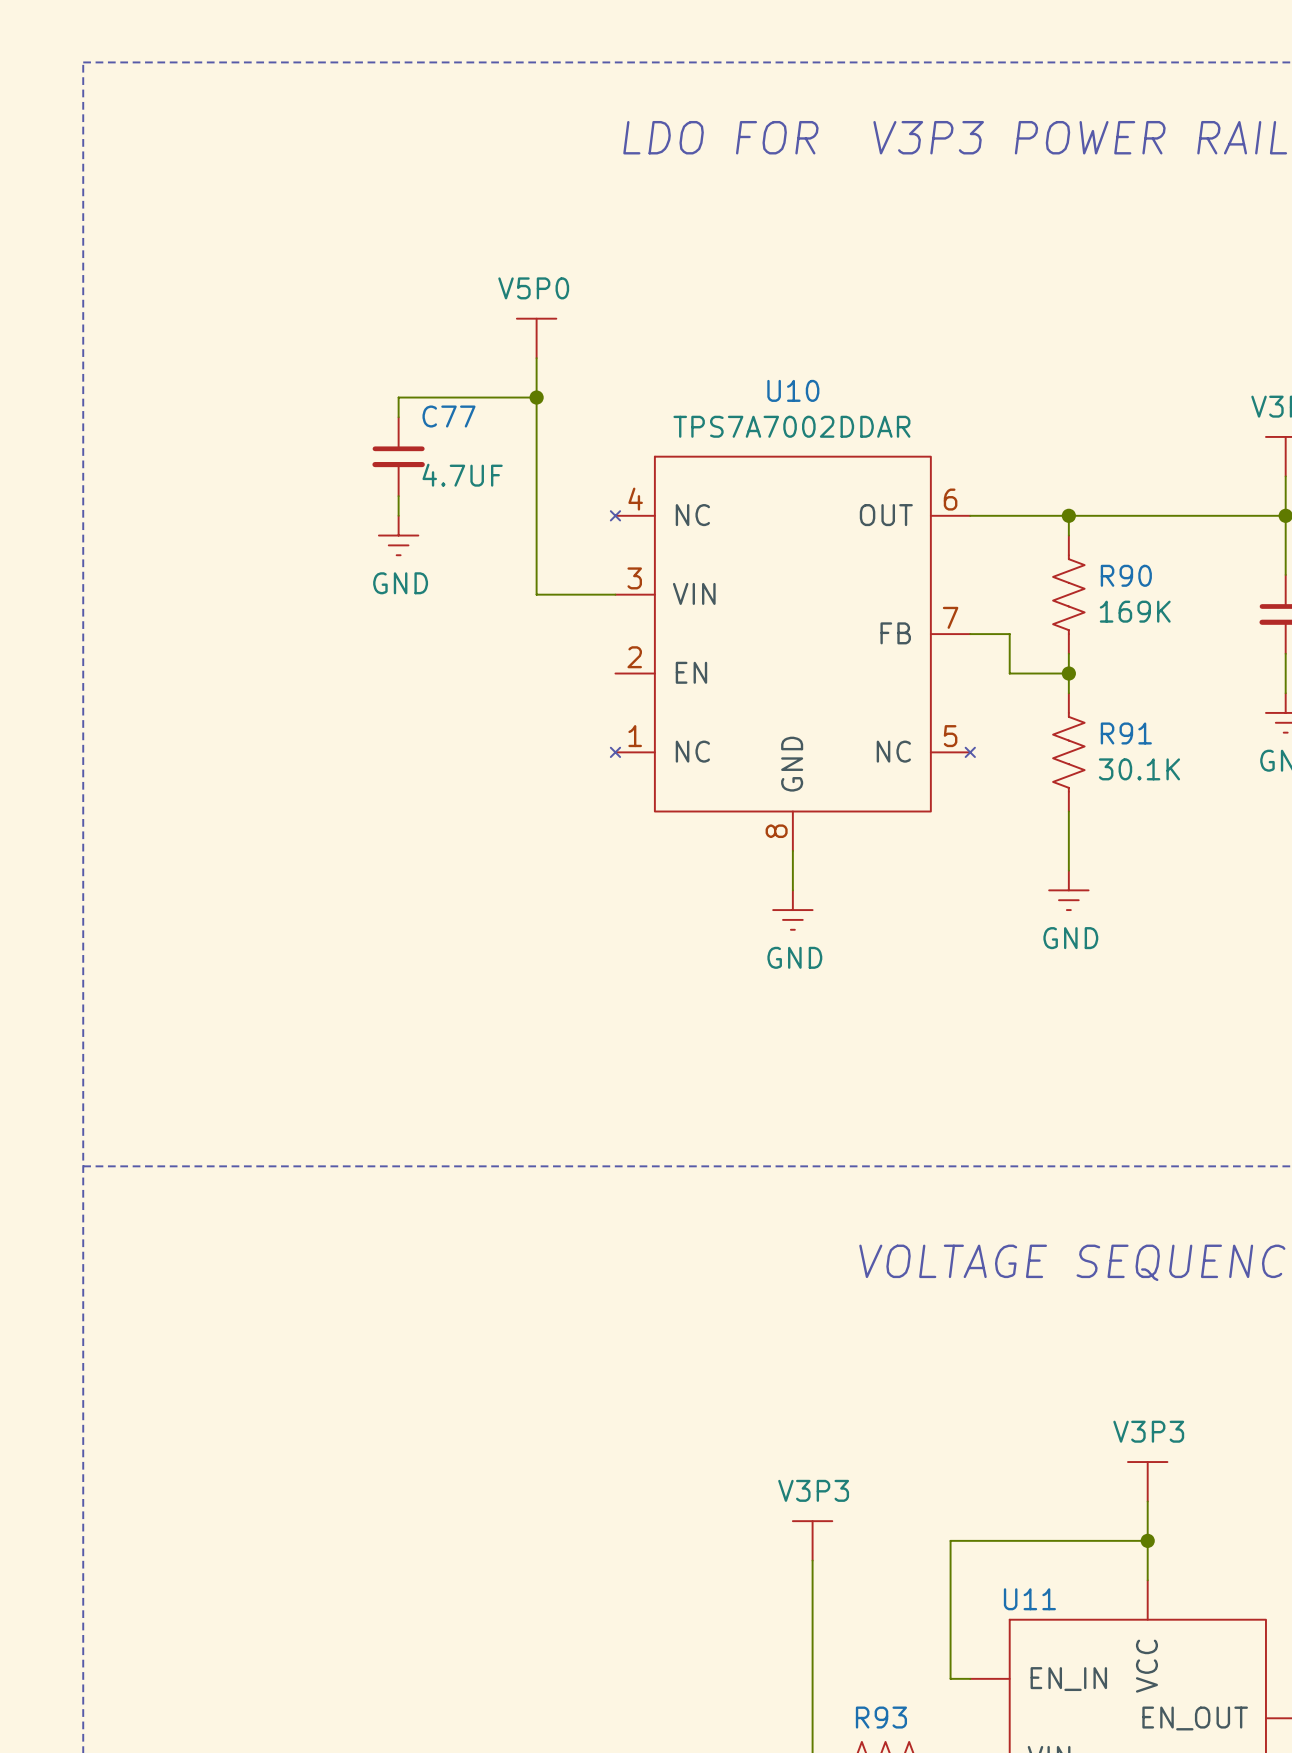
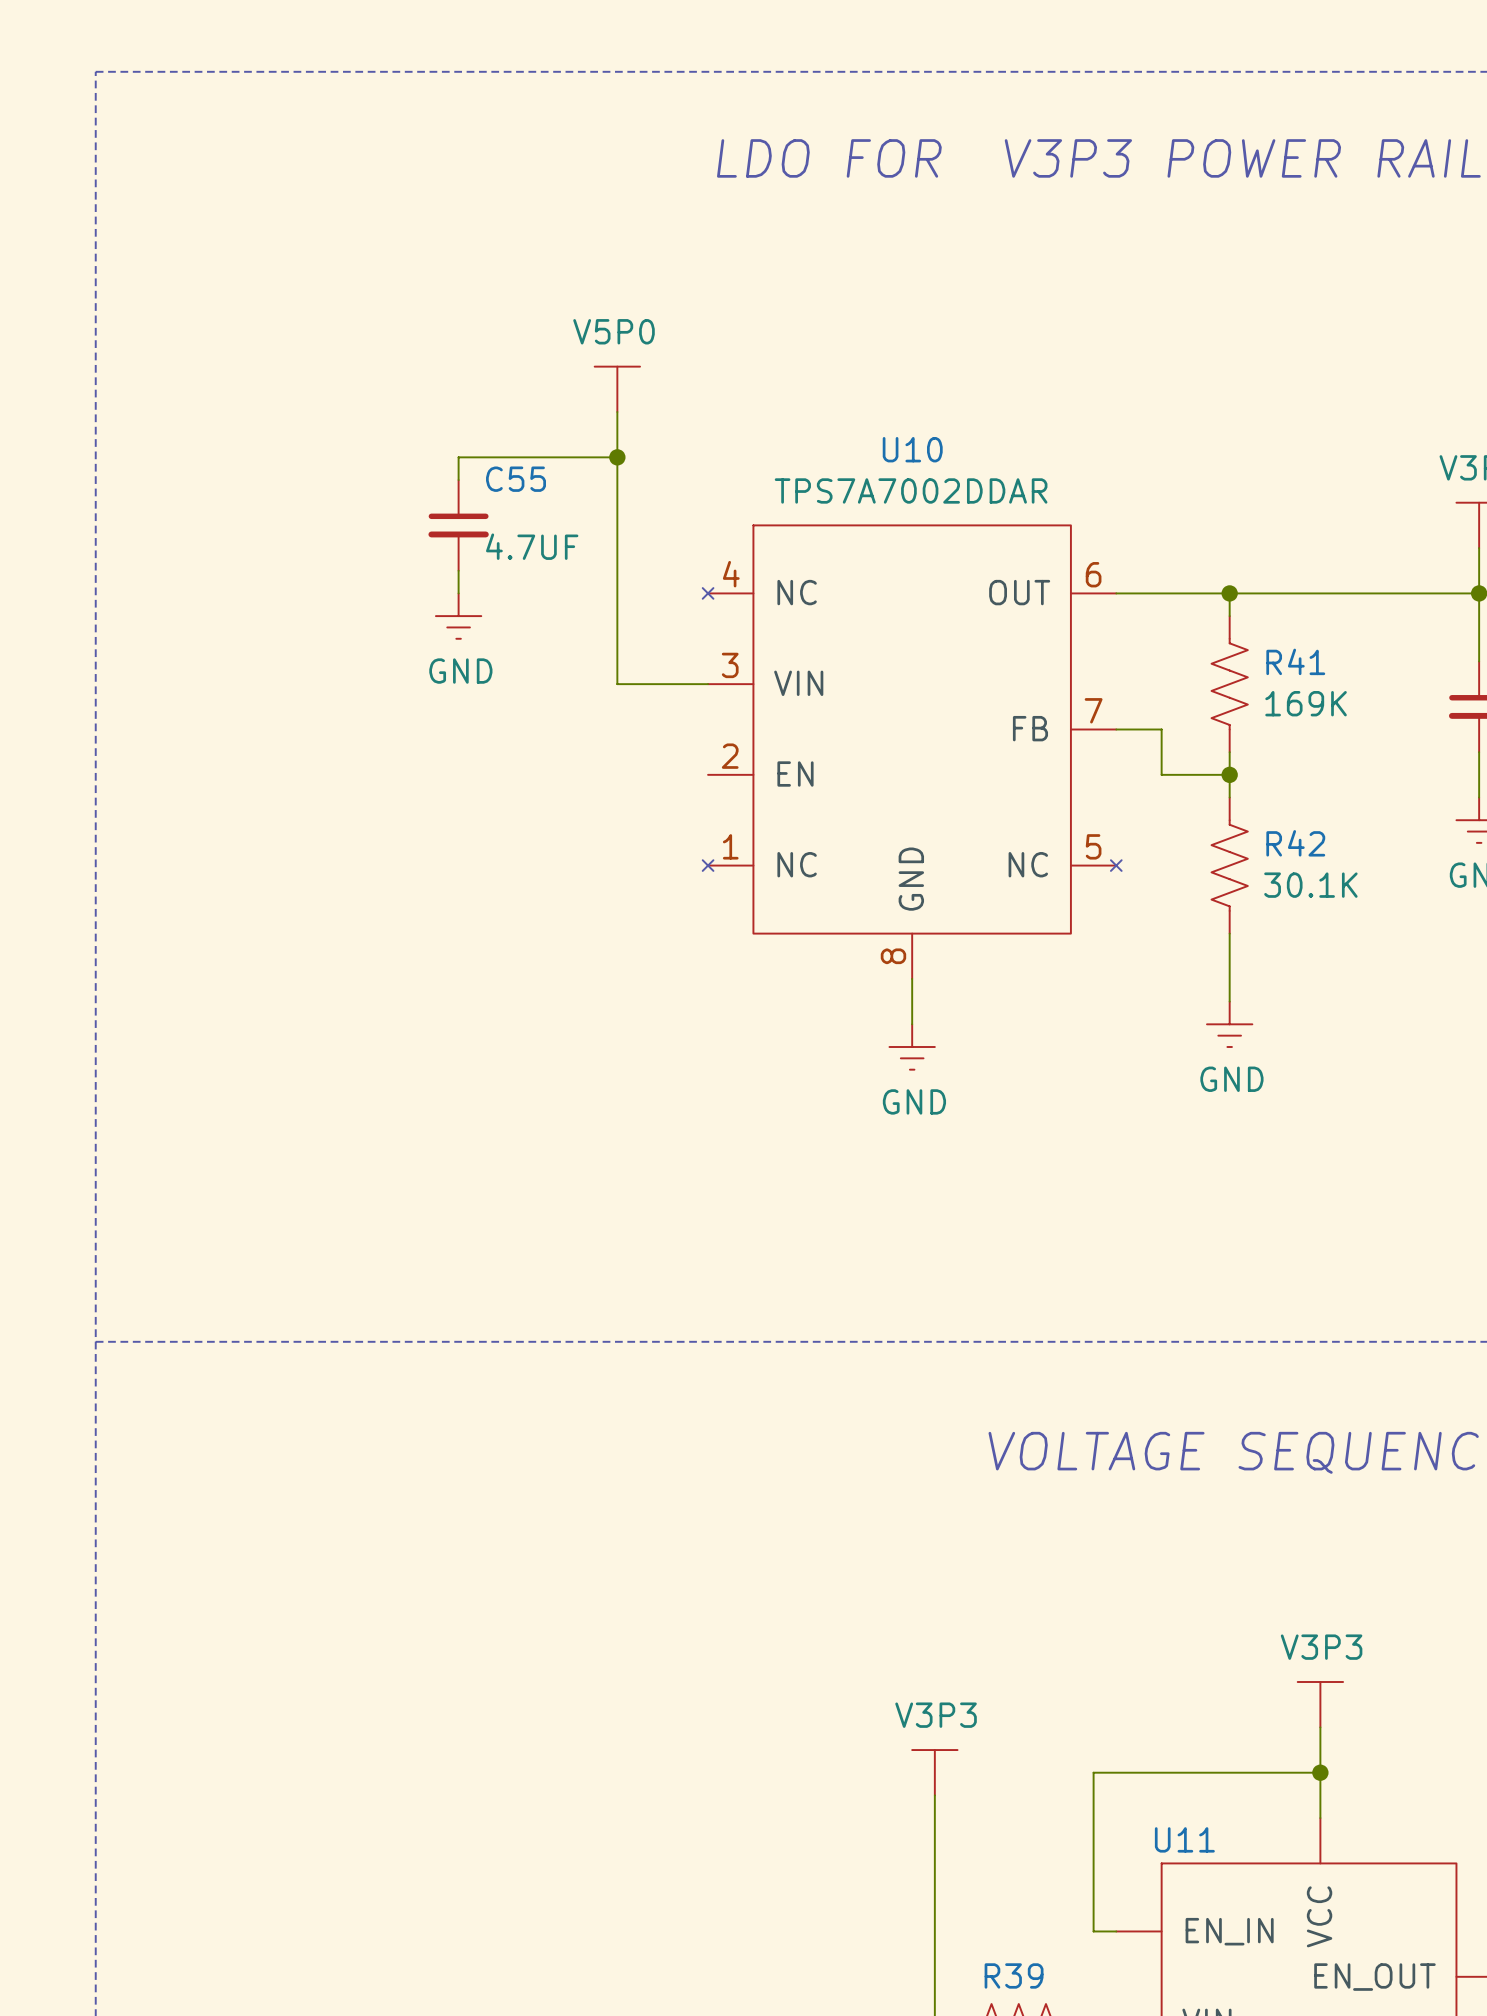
C77 name: C77 (448, 416) -> C55 (516, 479)
R90 name: R90 (1126, 575) -> R41 (1295, 661)
R91 name: R91 (1126, 733) -> R42 (1295, 843)
R93 name: R93 (881, 1717) -> R39 (1014, 1975)

